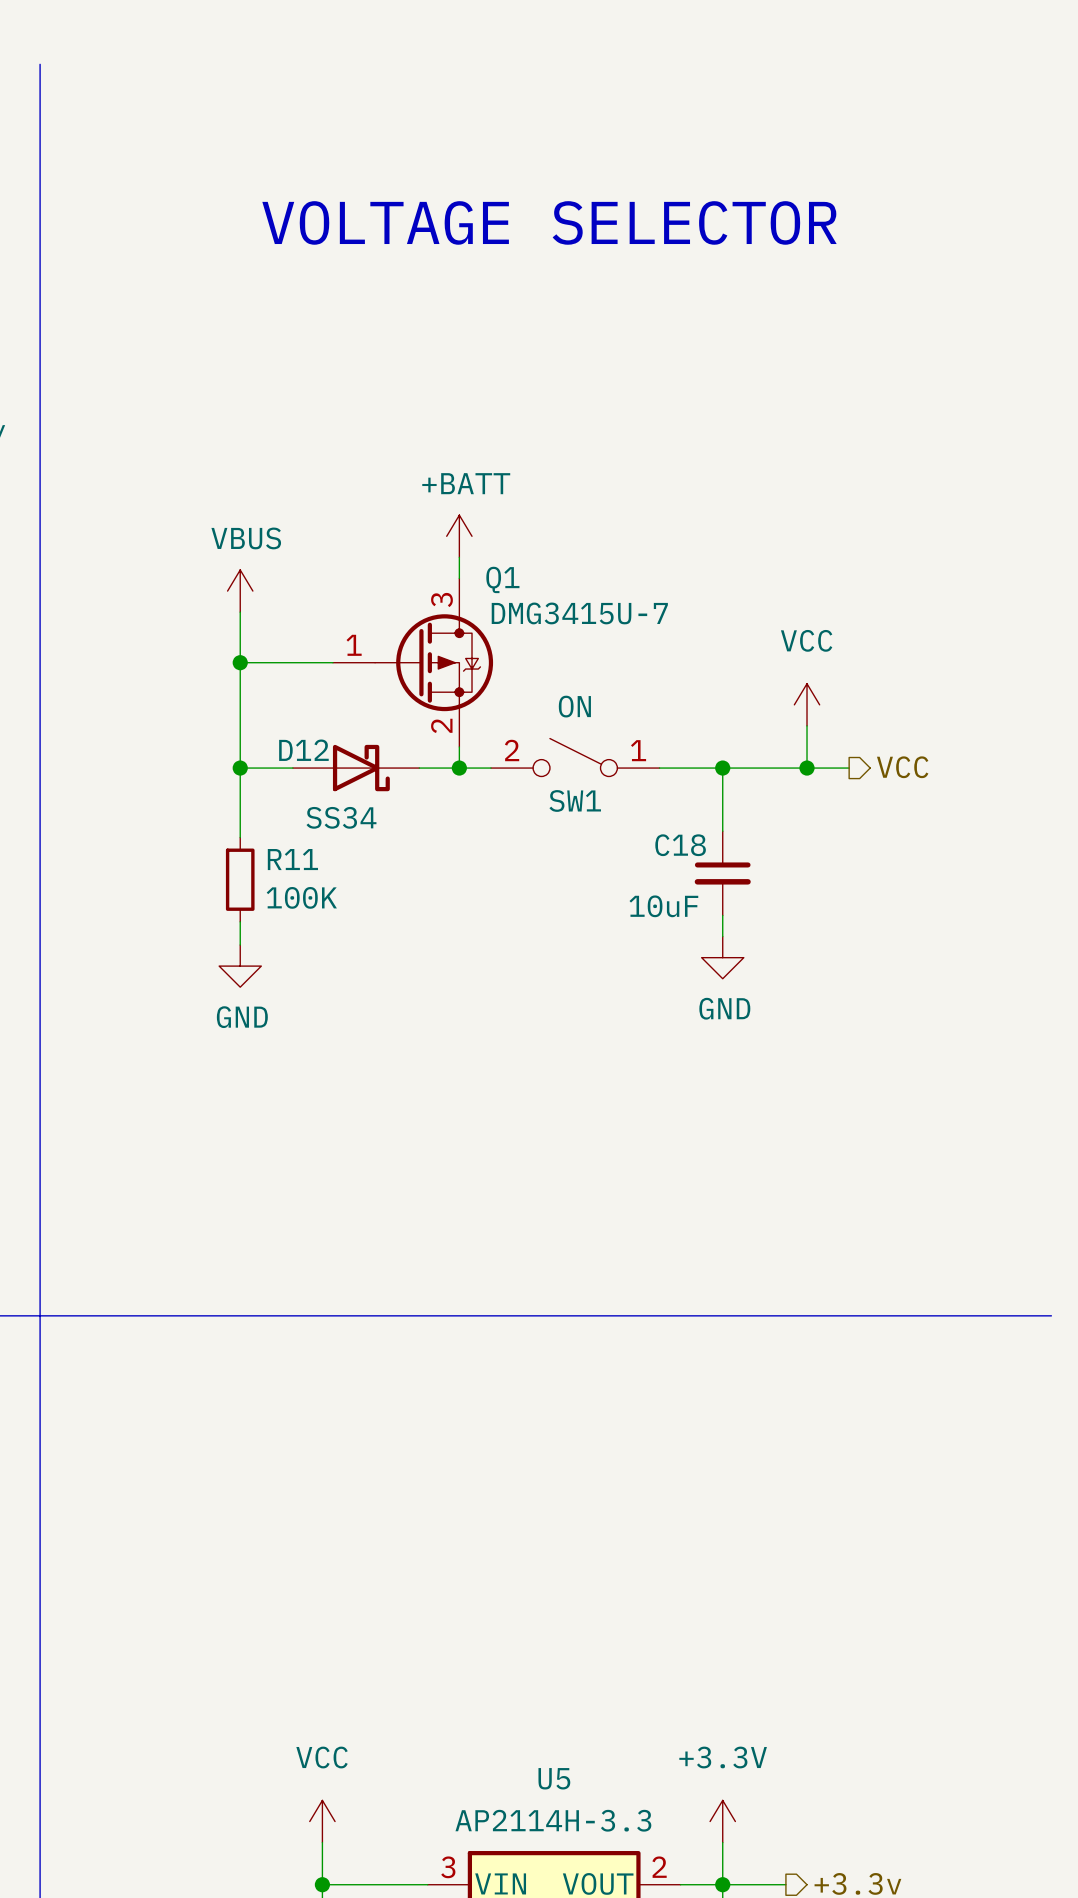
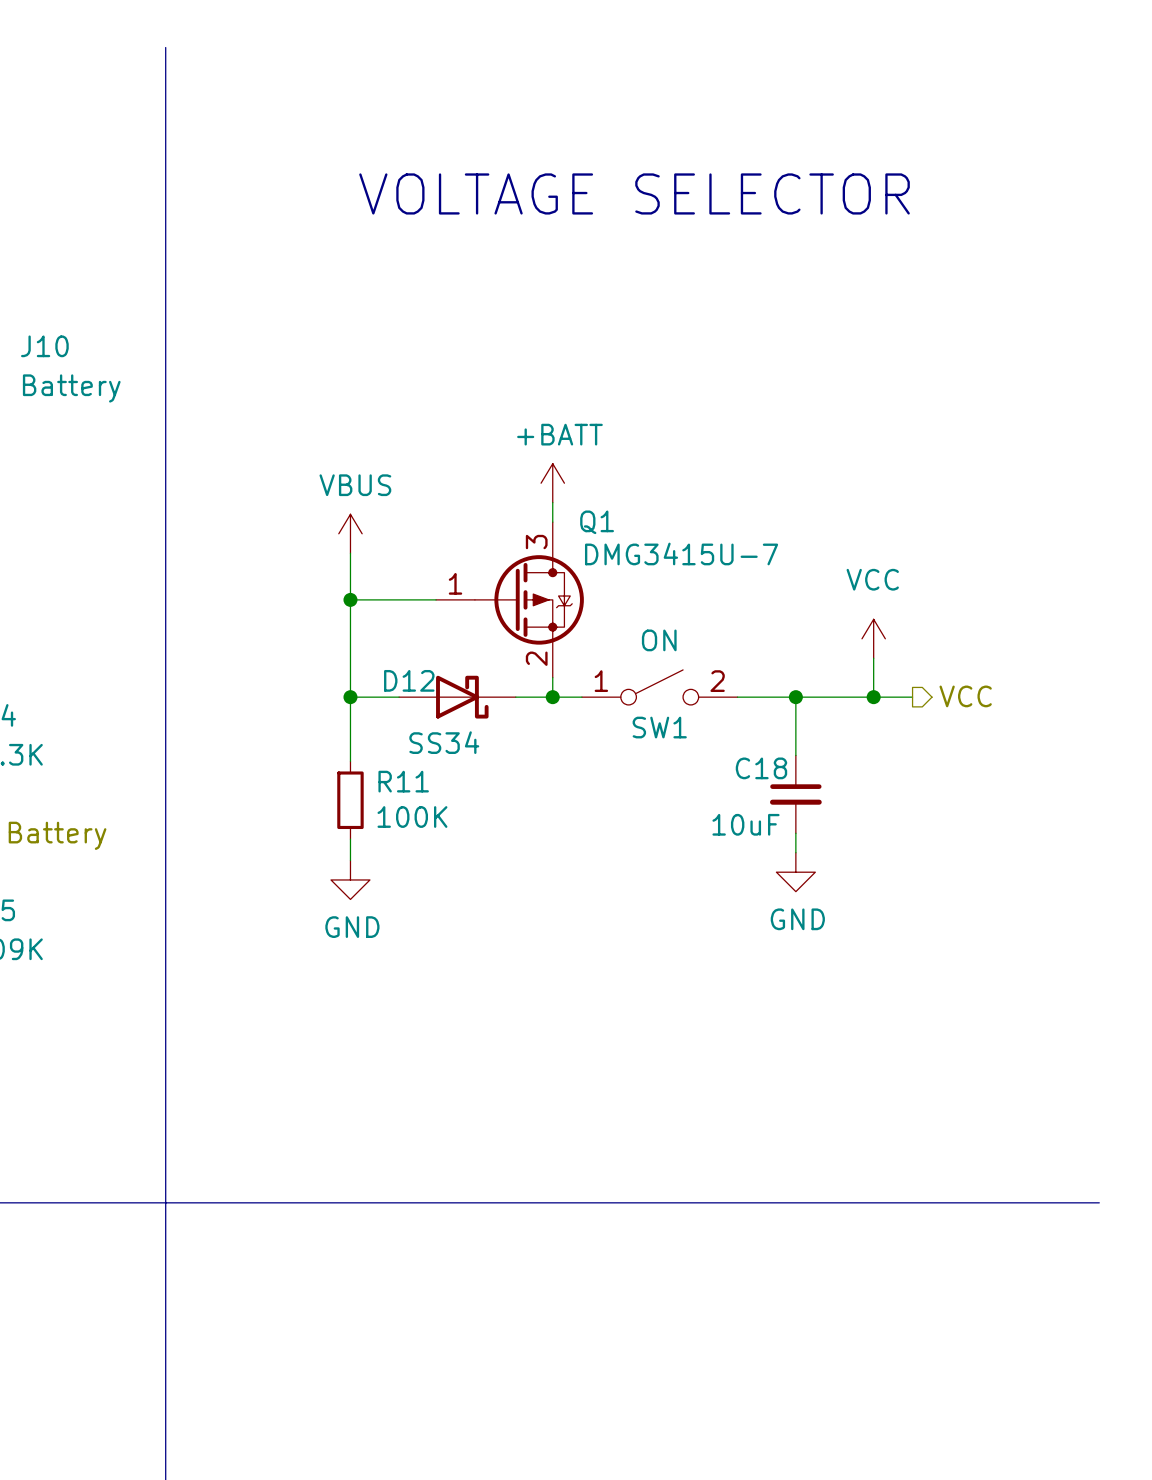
SW1 flip: as is (575, 757) -> left-right (659, 687)

